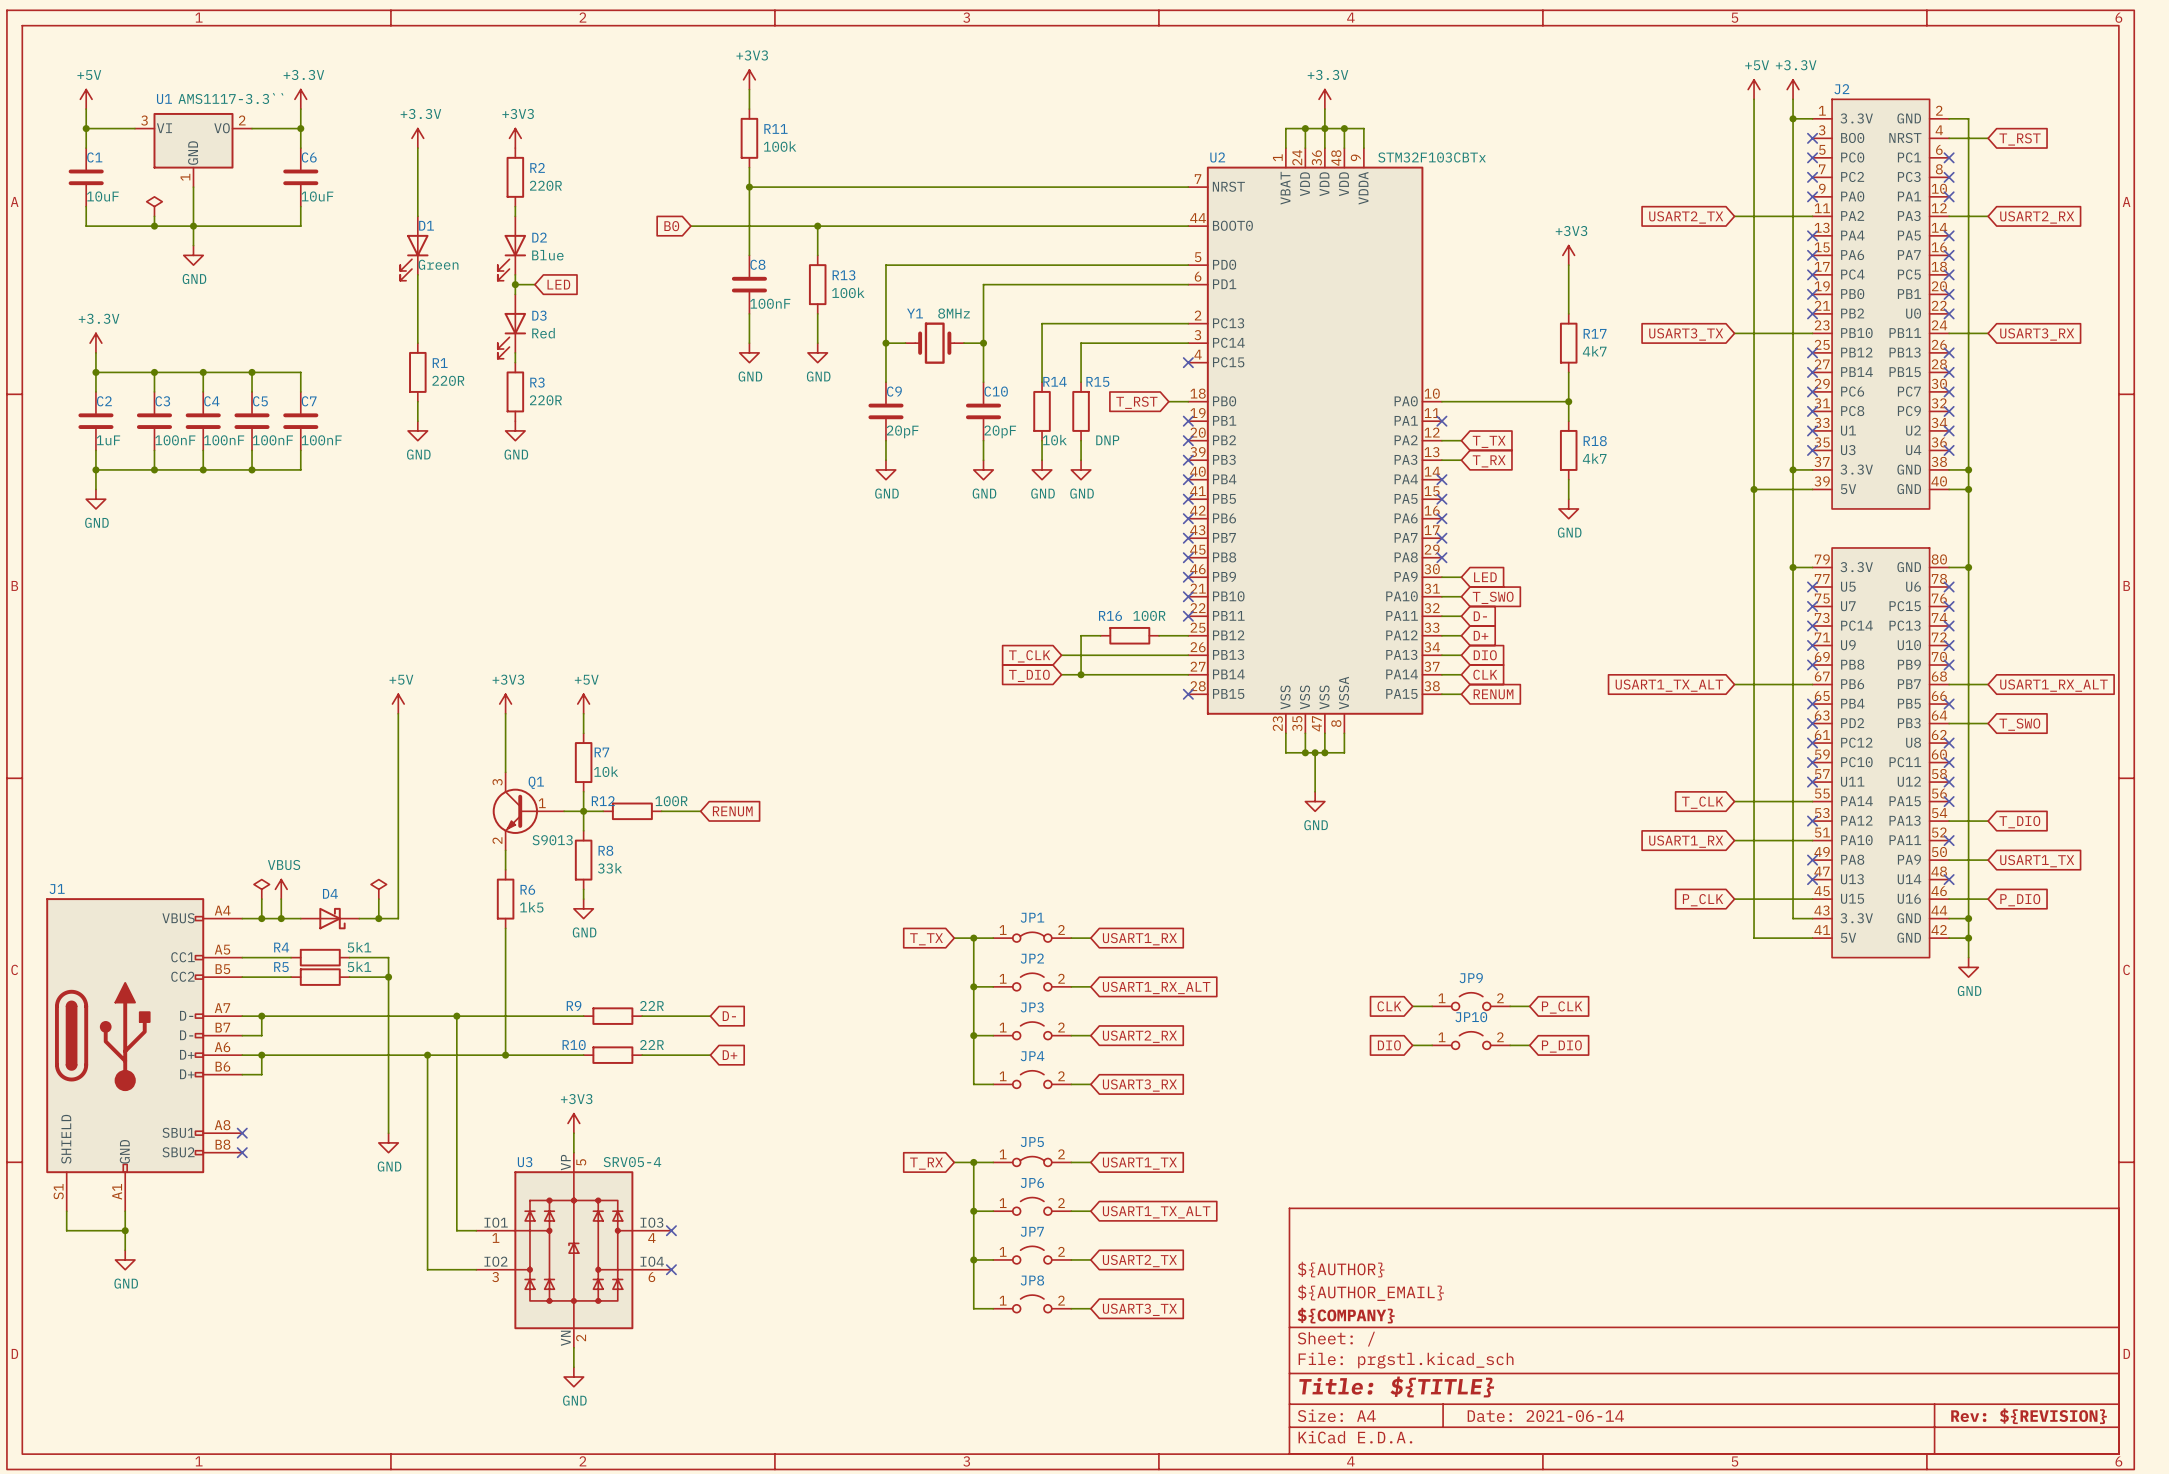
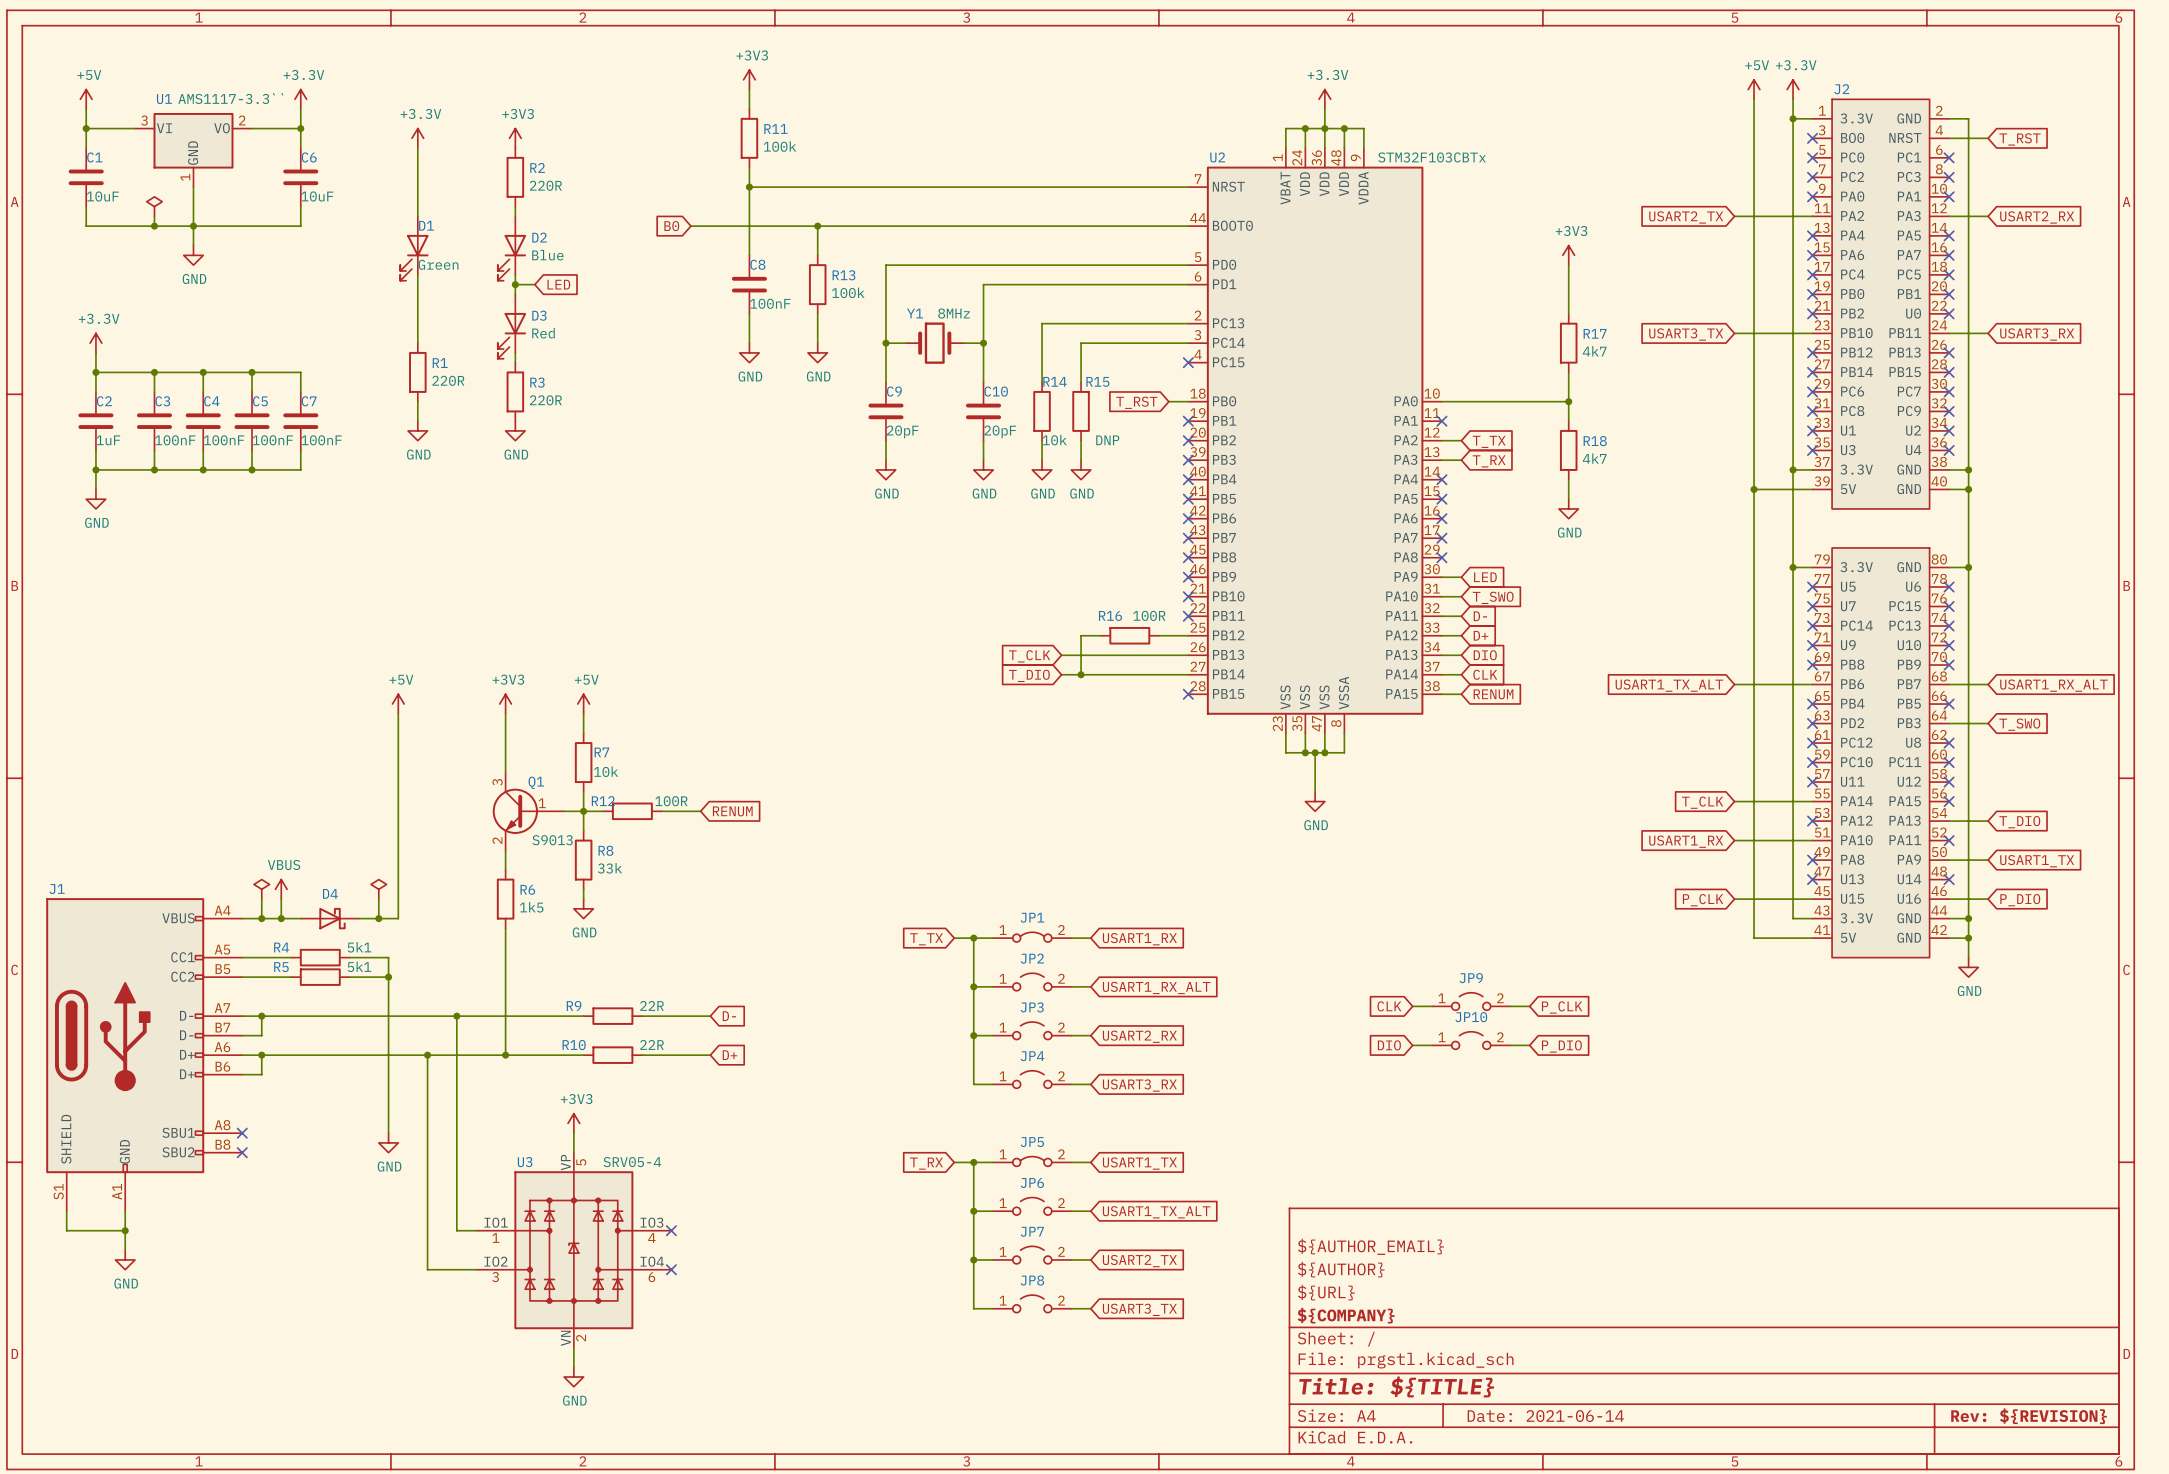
title block: none -> ${AUTHOR_EMAIL} (1370, 1246)
title block: ${AUTHOR_EMAIL} (1370, 1292) -> ${URL} (1326, 1292)

